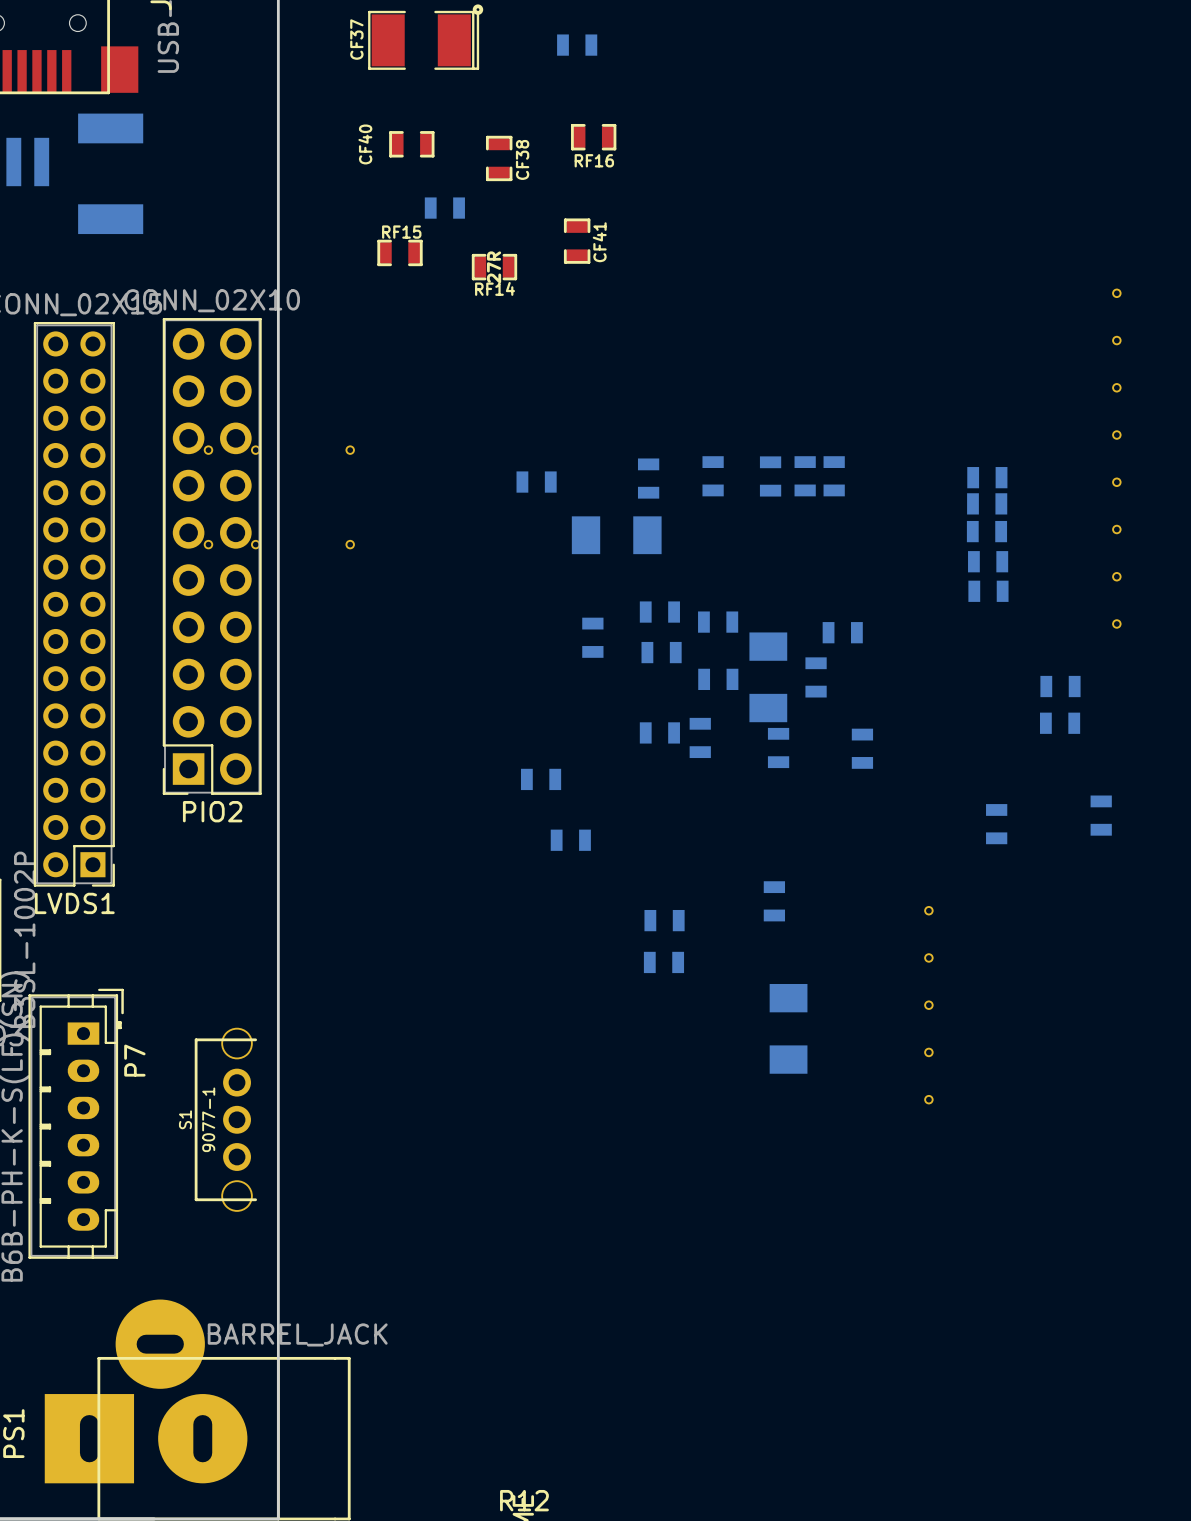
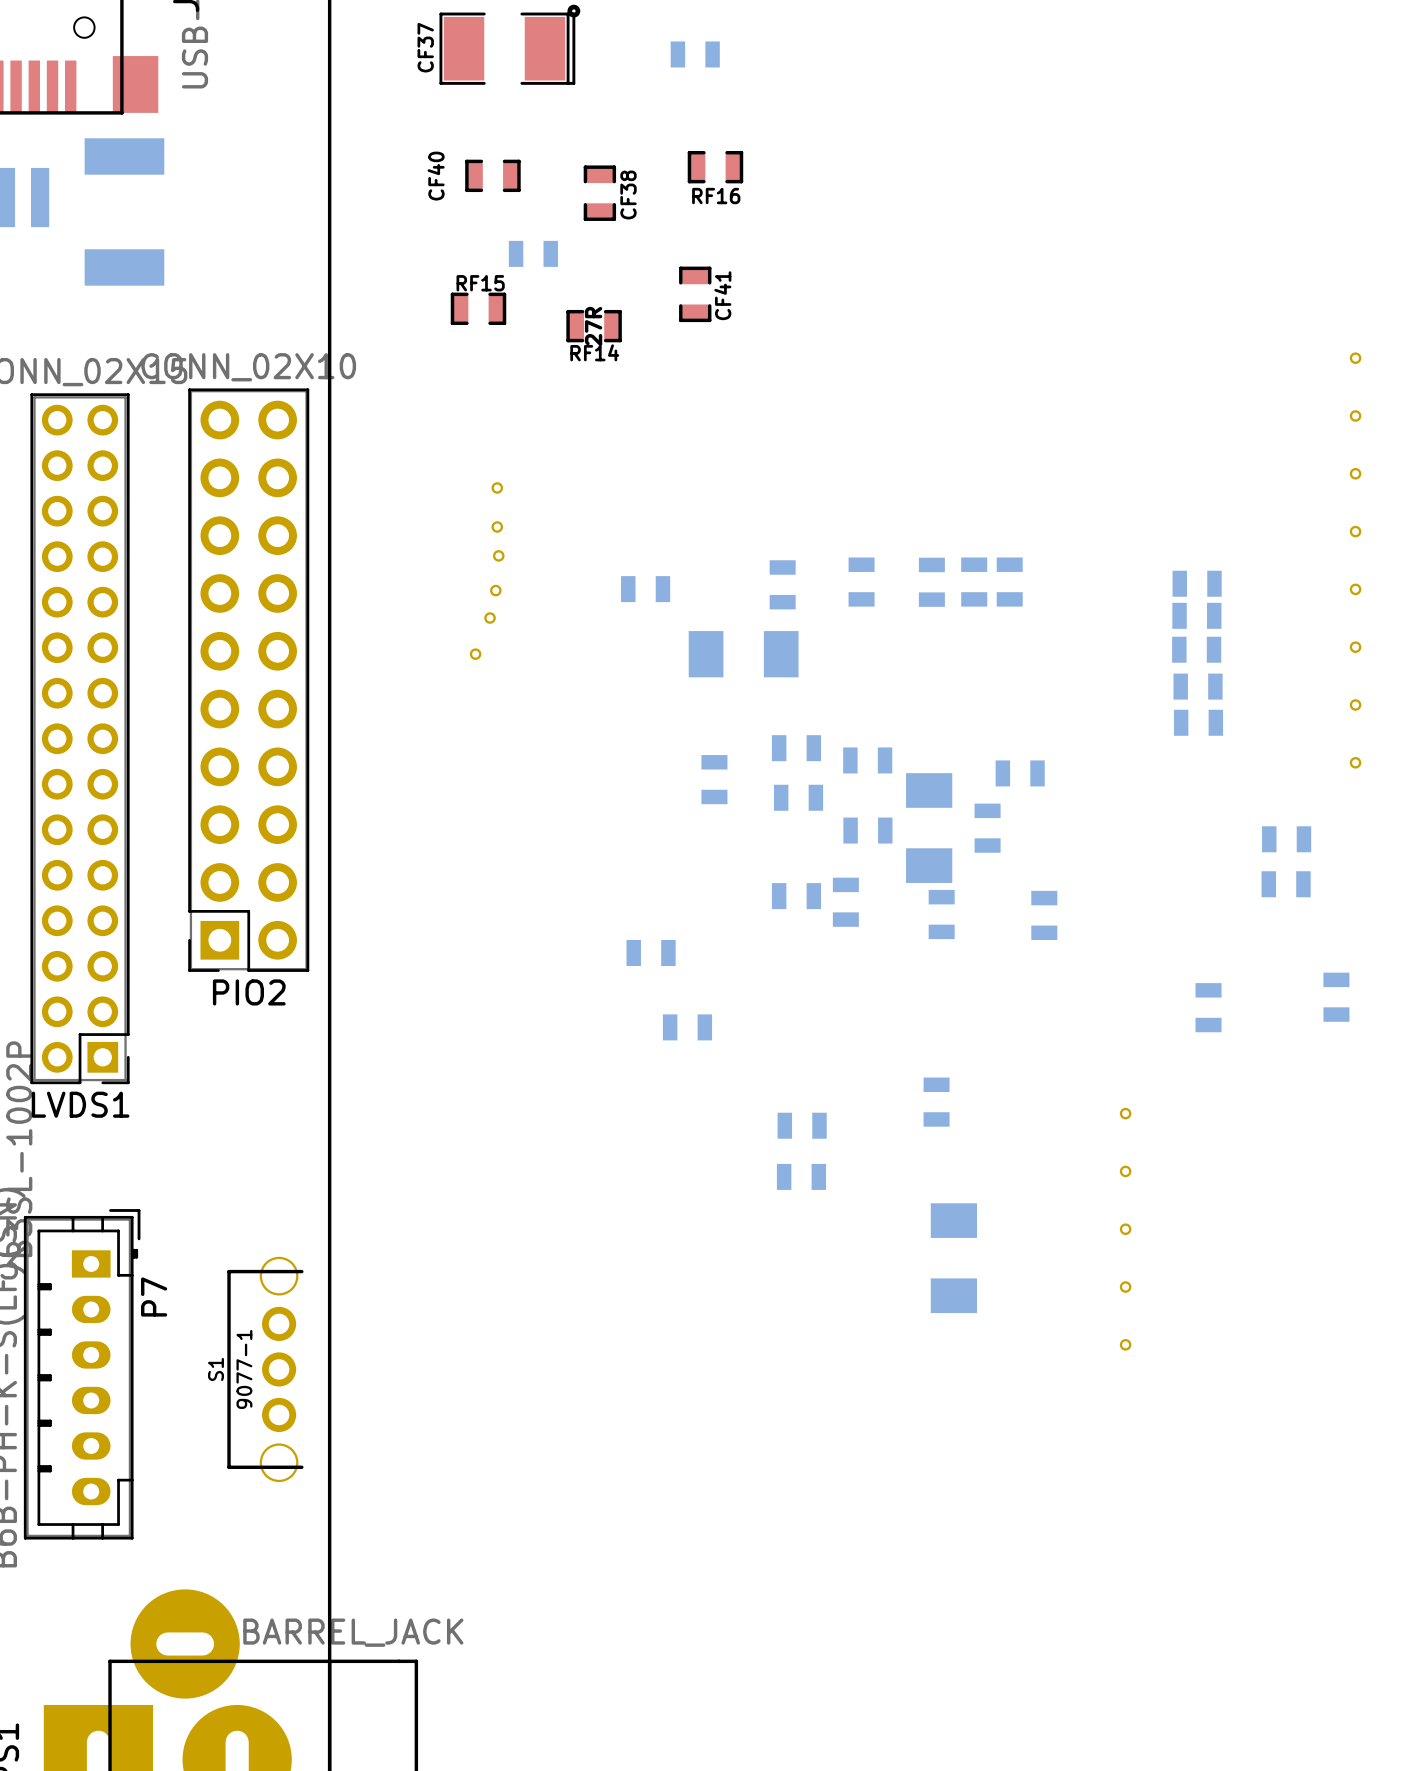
part: none -> (497, 487)
part: none -> (497, 526)
part: (208, 450) -> none
part: (255, 450) -> none
part: (350, 450) -> none
part: none -> (498, 555)
part: none -> (495, 590)
part: none -> (490, 618)
part: none -> (475, 654)
part: (208, 544) -> none
part: (255, 544) -> none
part: (350, 544) -> none

